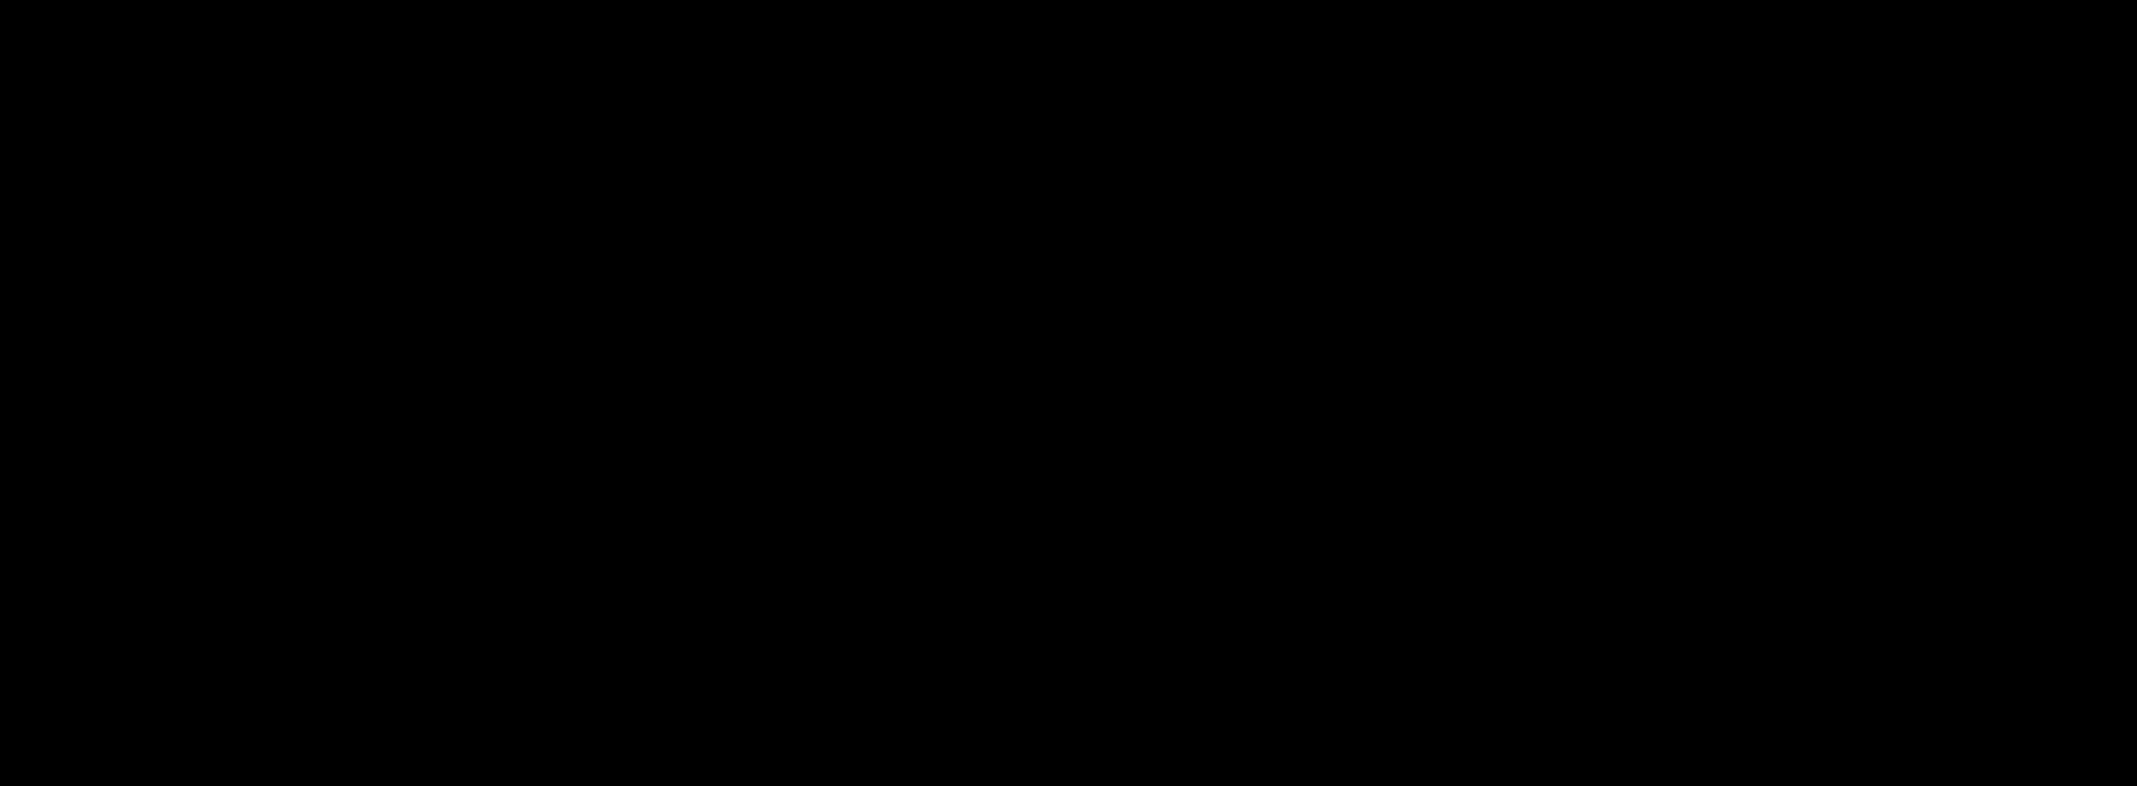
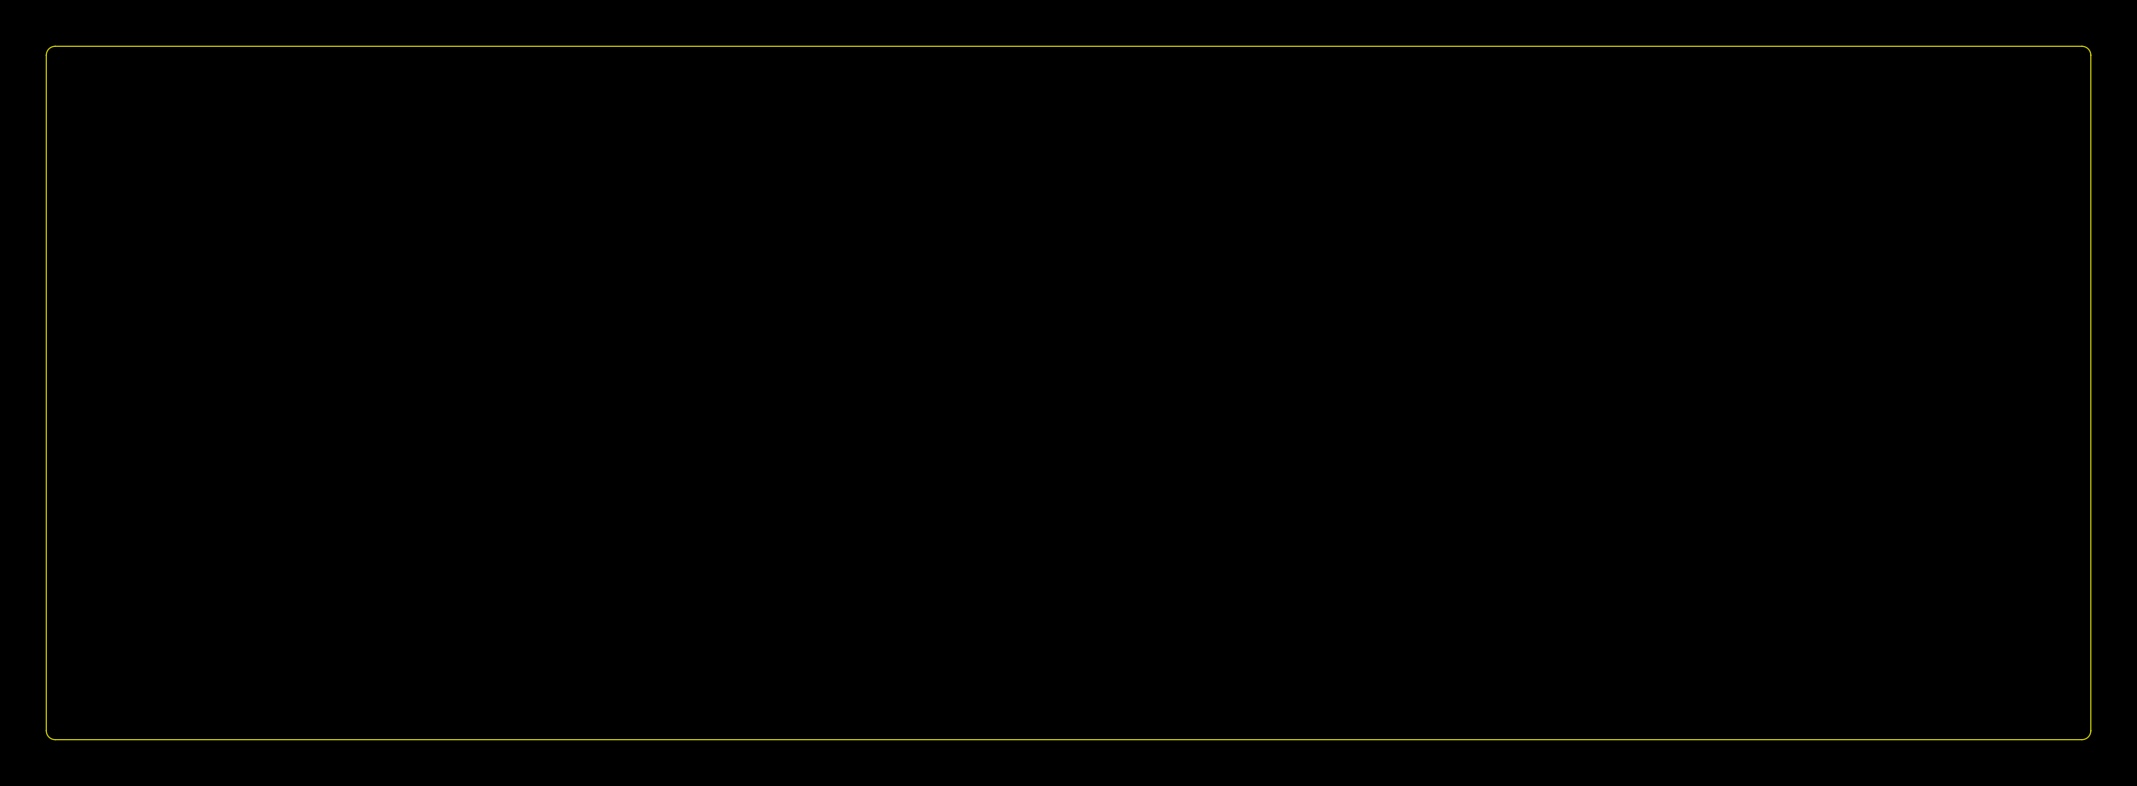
board edge: none -> (55, 46) (2084, 46) (2088, 49) (2090, 55) (2090, 733) (2086, 738) (2081, 739) (52, 739) (47, 735) (46, 730) (46, 55) (48, 48) (55, 46)

